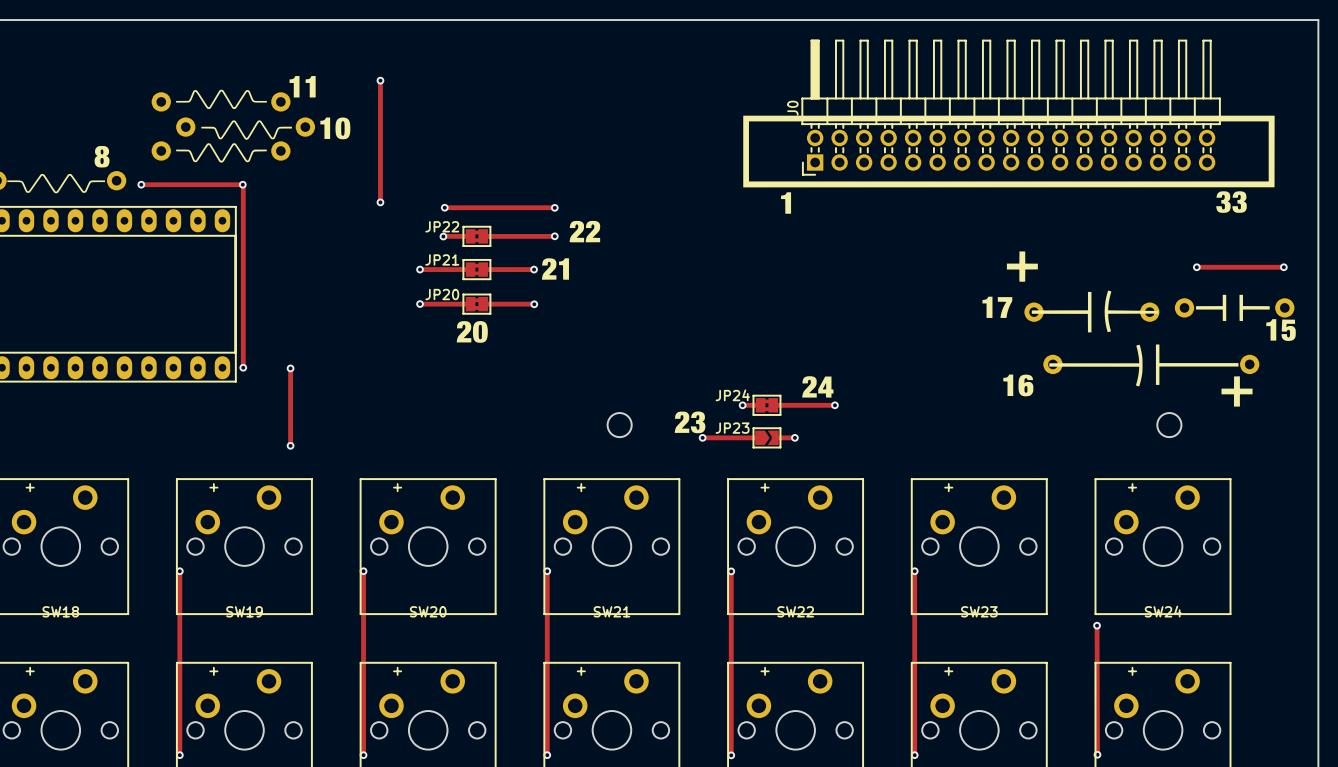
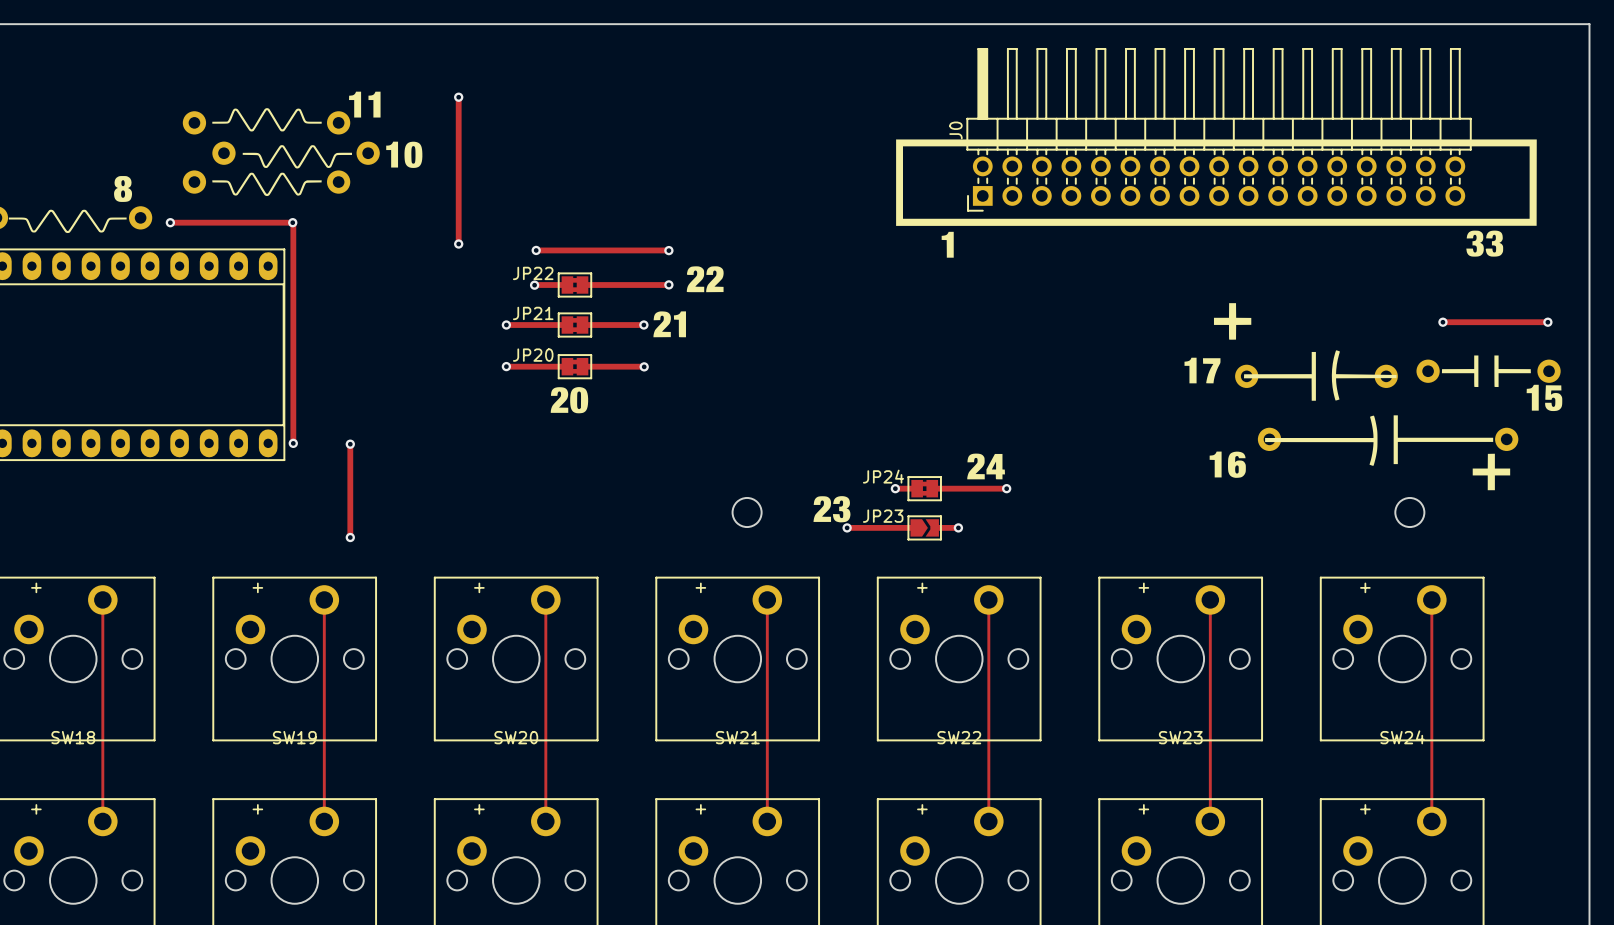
track: none -> (102, 599) (102, 821)
track: none -> (324, 599) (324, 821)
track: none -> (545, 599) (545, 821)
track: none -> (767, 599) (767, 821)
track: none -> (988, 599) (988, 821)
track: none -> (1210, 599) (1210, 821)
track: none -> (1431, 599) (1431, 821)
track: (179, 571) (179, 755) -> none
via: (179, 571) -> none
track: (363, 571) (363, 755) -> none
via: (363, 571) -> none
track: (547, 571) (547, 755) -> none
via: (547, 571) -> none
track: (731, 571) (731, 755) -> none
via: (731, 571) -> none
track: (914, 571) (914, 755) -> none
via: (914, 571) -> none
track: (1097, 625) (1097, 754) -> none
via: (1097, 625) -> none
via: (1097, 754) -> none
via: (179, 755) -> none
via: (363, 755) -> none
via: (547, 755) -> none
via: (731, 755) -> none
via: (914, 755) -> none

